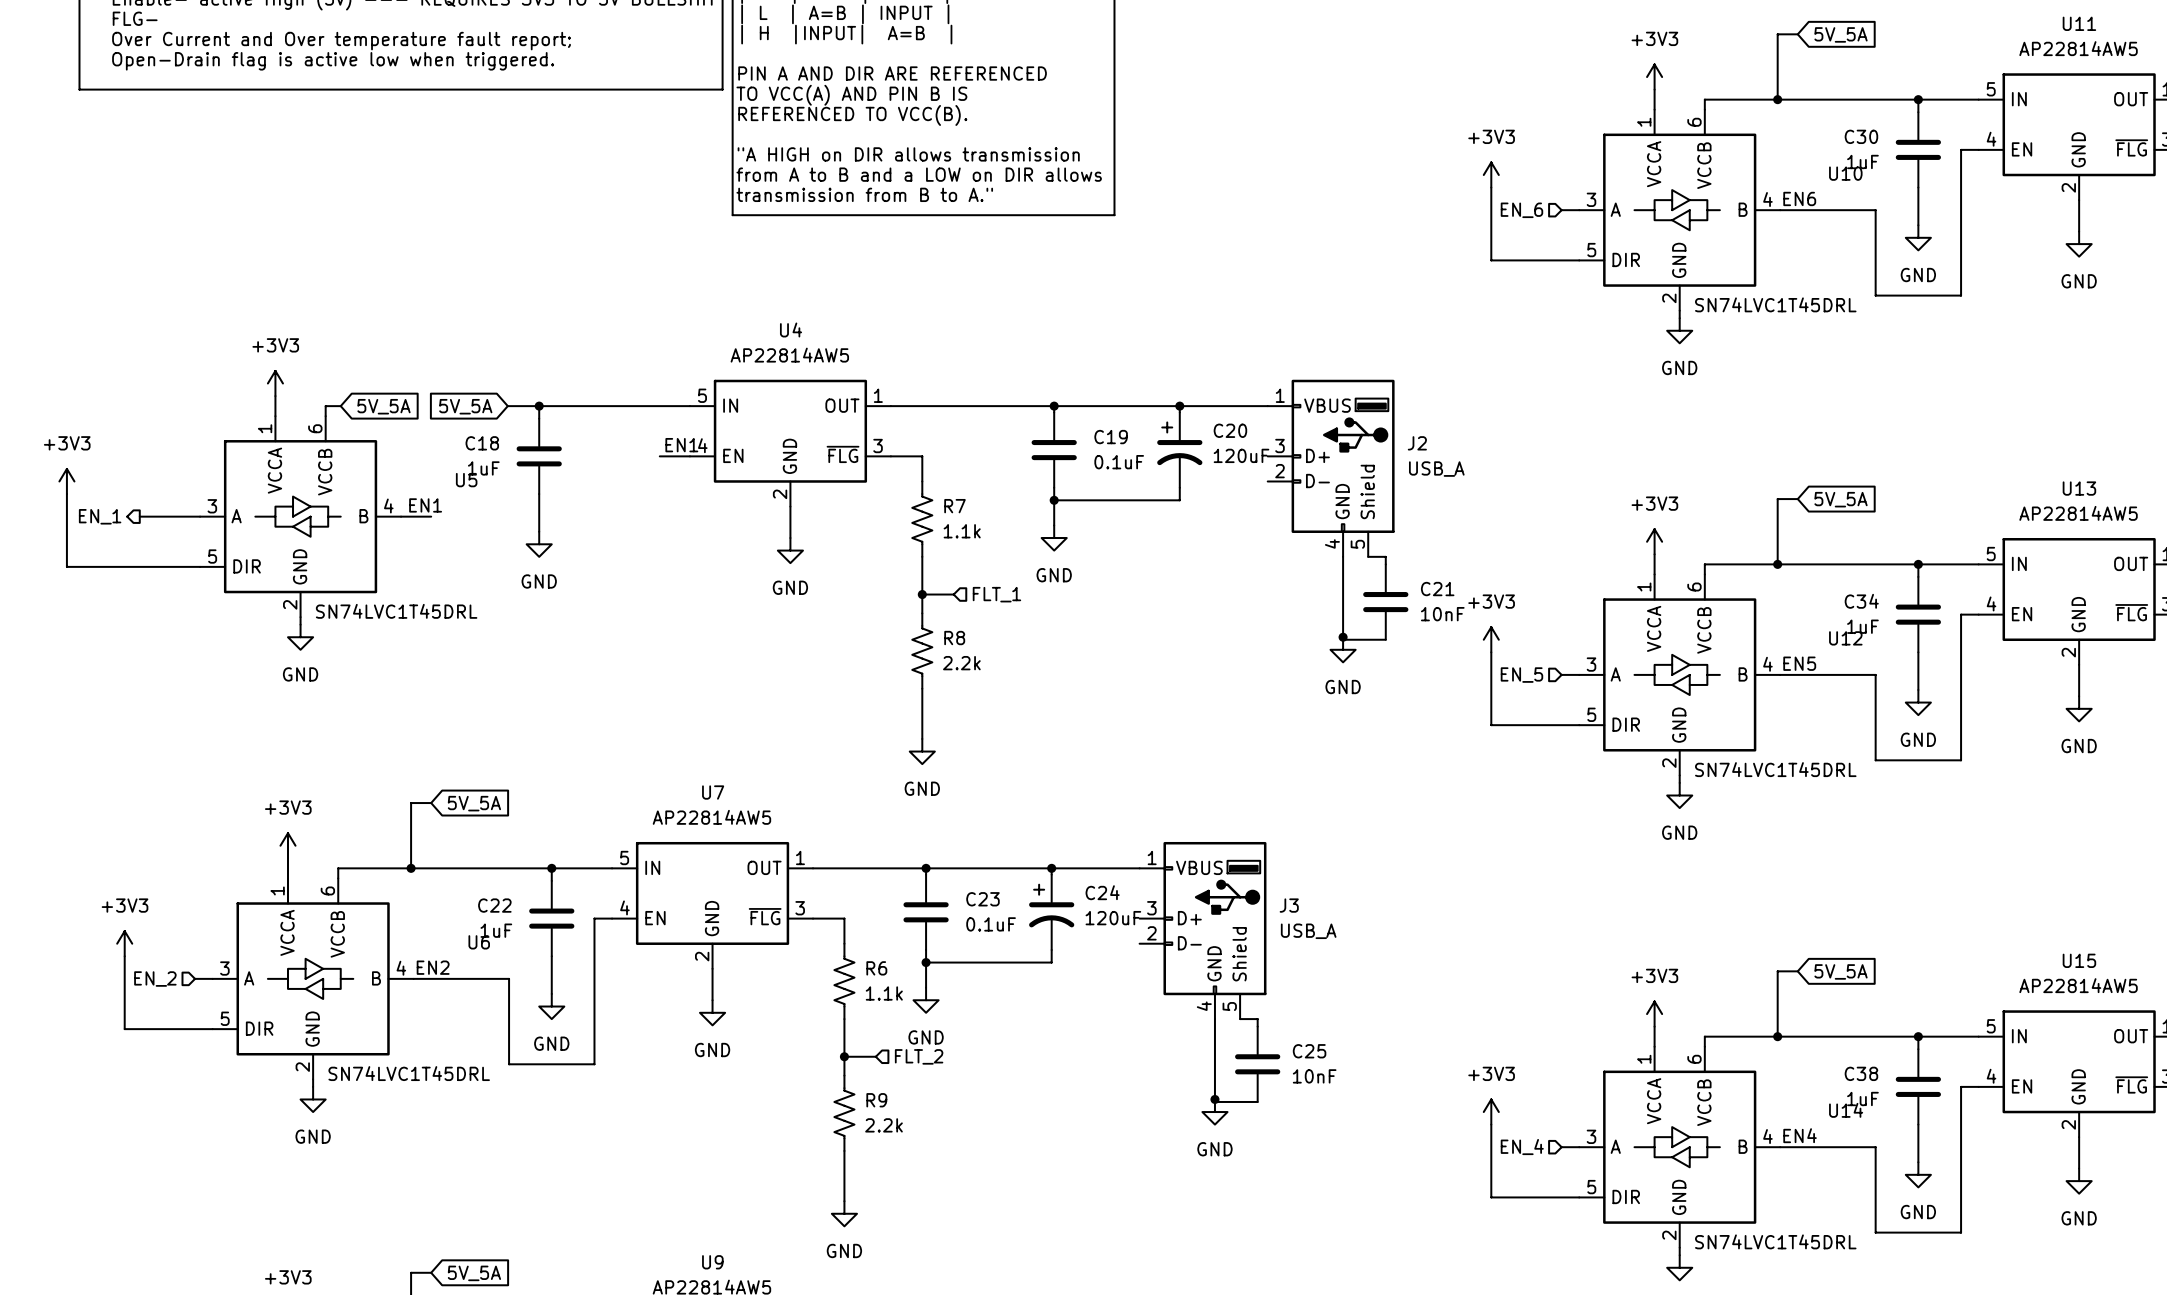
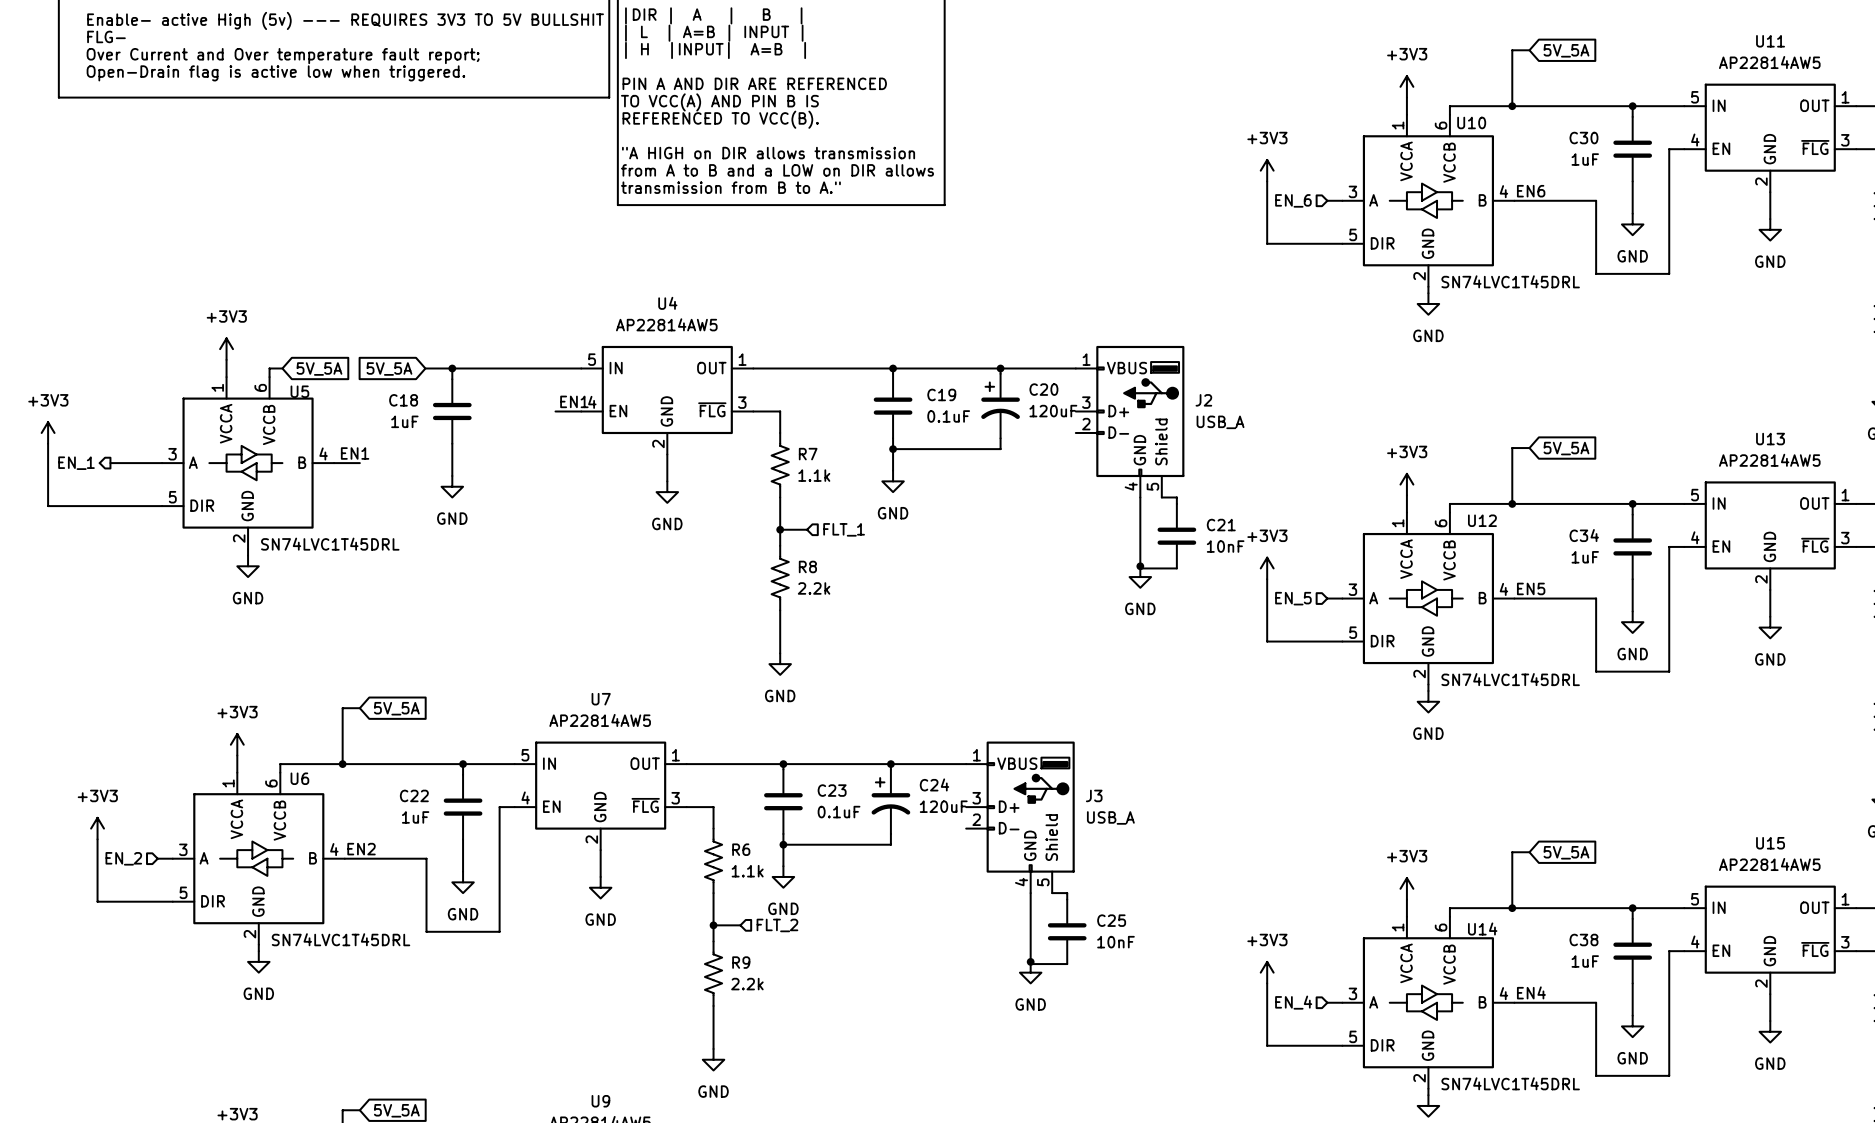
U10 name position: U10 (1845, 173) -> U10 (1471, 122)
U5 name position: U5 (466, 480) -> U5 (299, 391)
U12 name position: U12 (1845, 638) -> U12 (1482, 520)
U6 name position: U6 (479, 942) -> U6 (299, 778)
U14 name position: U14 (1846, 1110) -> U14 (1482, 928)

